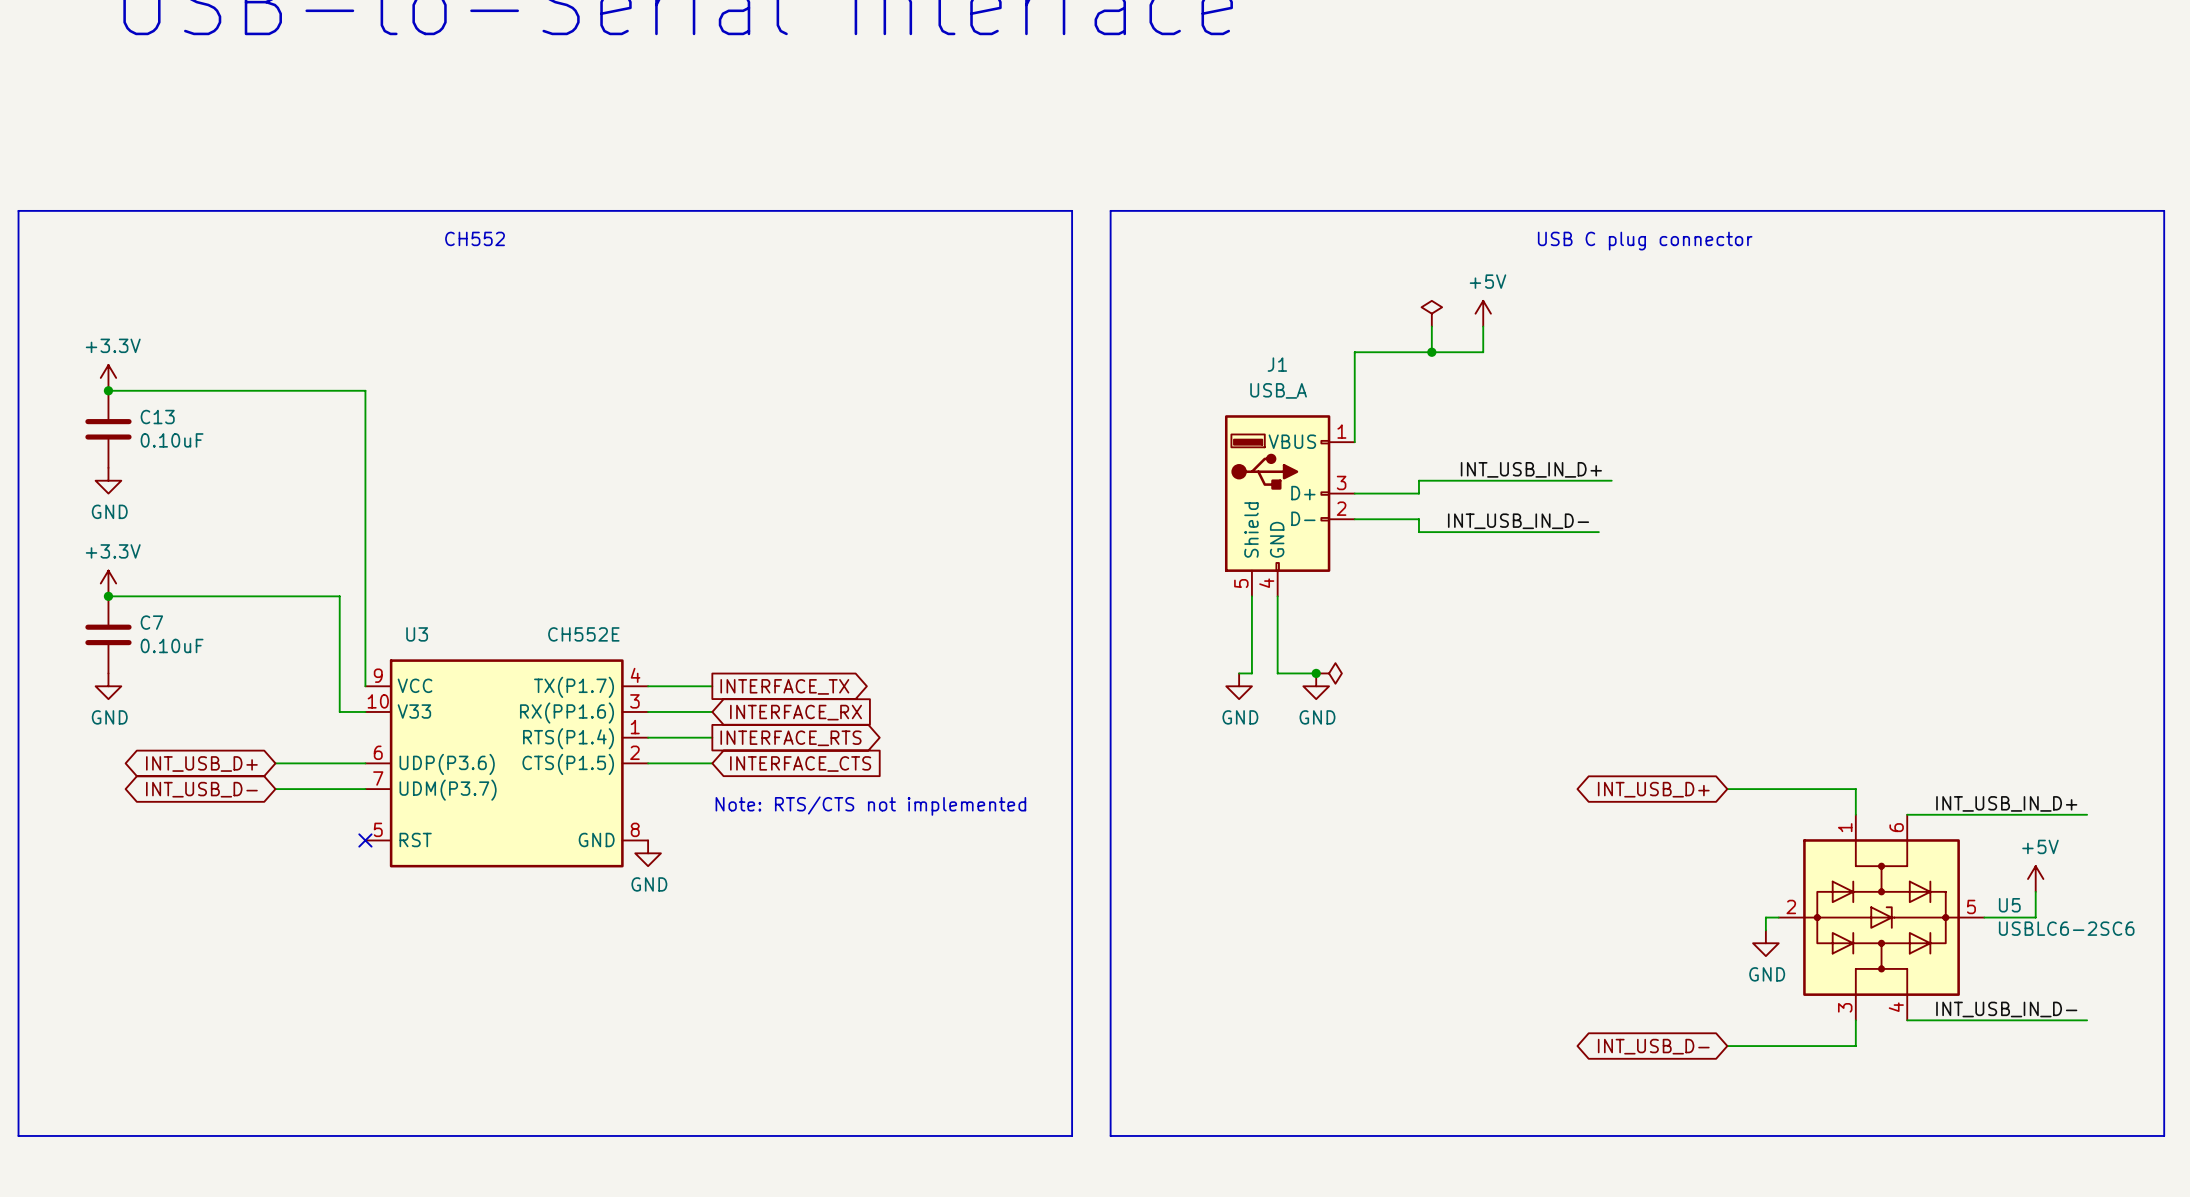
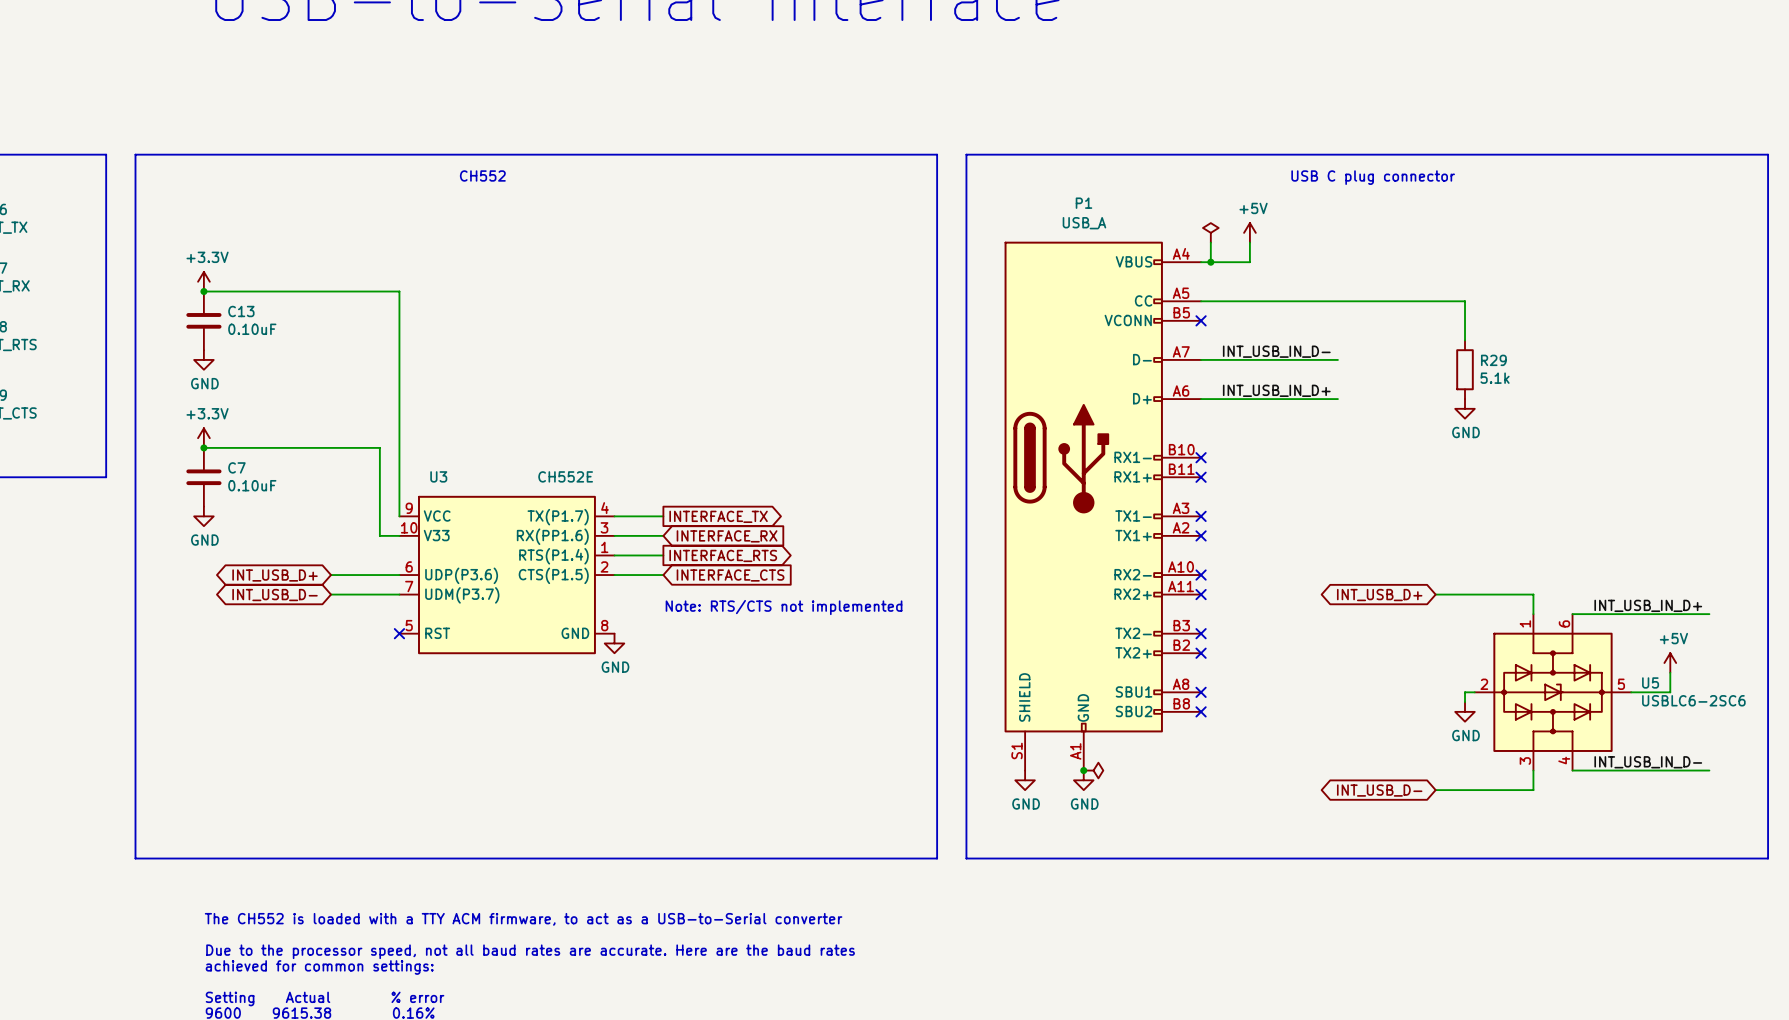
wire: none -> (1201, 301) (1465, 301) (1465, 340)
no-connect mark: none -> (1201, 320)
label: INT_USB_IN_D+ (1531, 469) -> INT_USB_IN_D- (1276, 351)
wire: (1418, 480) (1418, 493) (1354, 493) -> none
wire: (1598, 480) (1611, 480) -> none
R29: none -> 5.1k (1465, 369)
J1: USB_A (1289, 505) -> none
wire: (1354, 519) (1418, 519) (1418, 532) -> none
label: INT_USB_IN_D- (1518, 521) -> INT_USB_IN_D+ (1276, 390)
power symbol: none -> GND (1465, 408)
no-connect mark: none -> (1201, 457)
no-connect mark: none -> (1201, 477)
P1: none -> USB_A (1102, 506)
junction: (1316, 673) -> none
power symbol: (1329, 673) -> none
power symbol: GND (1239, 686) -> none
power symbol: GND (1316, 686) -> none
no-connect mark: none -> (1201, 516)
no-connect mark: none -> (1201, 535)
no-connect mark: none -> (1201, 575)
no-connect mark: none -> (1201, 594)
no-connect mark: none -> (1201, 633)
no-connect mark: none -> (1201, 653)
no-connect mark: none -> (1201, 692)
no-connect mark: none -> (1201, 711)
junction: none -> (1083, 770)
power symbol: none -> (1093, 770)
power symbol: none -> GND (1025, 780)
power symbol: none -> GND (1083, 780)

